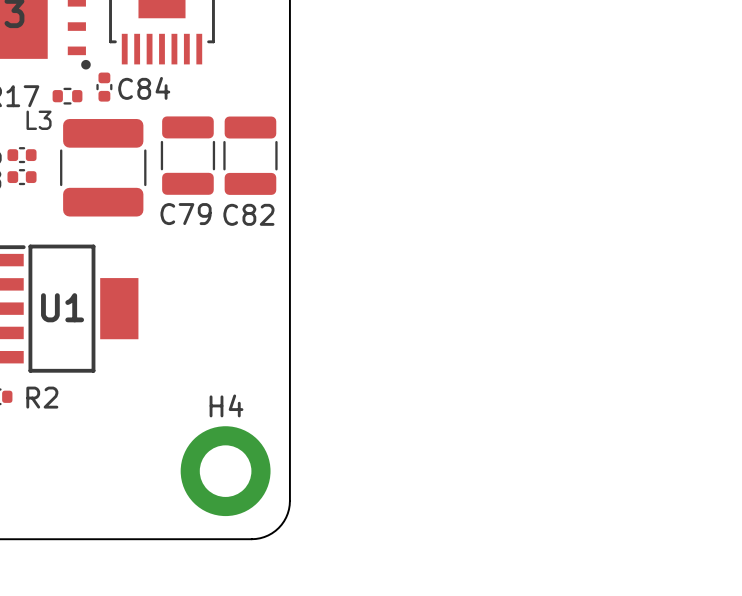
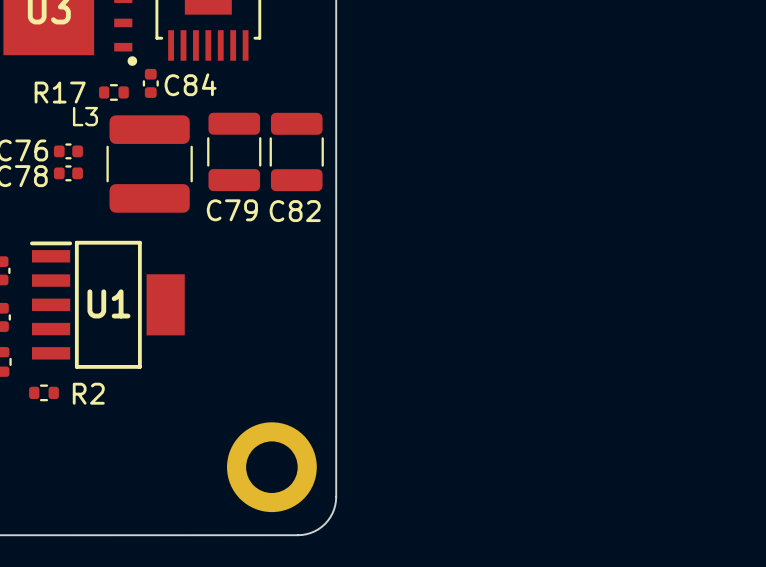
H4 name: H4 (226, 405) -> none

